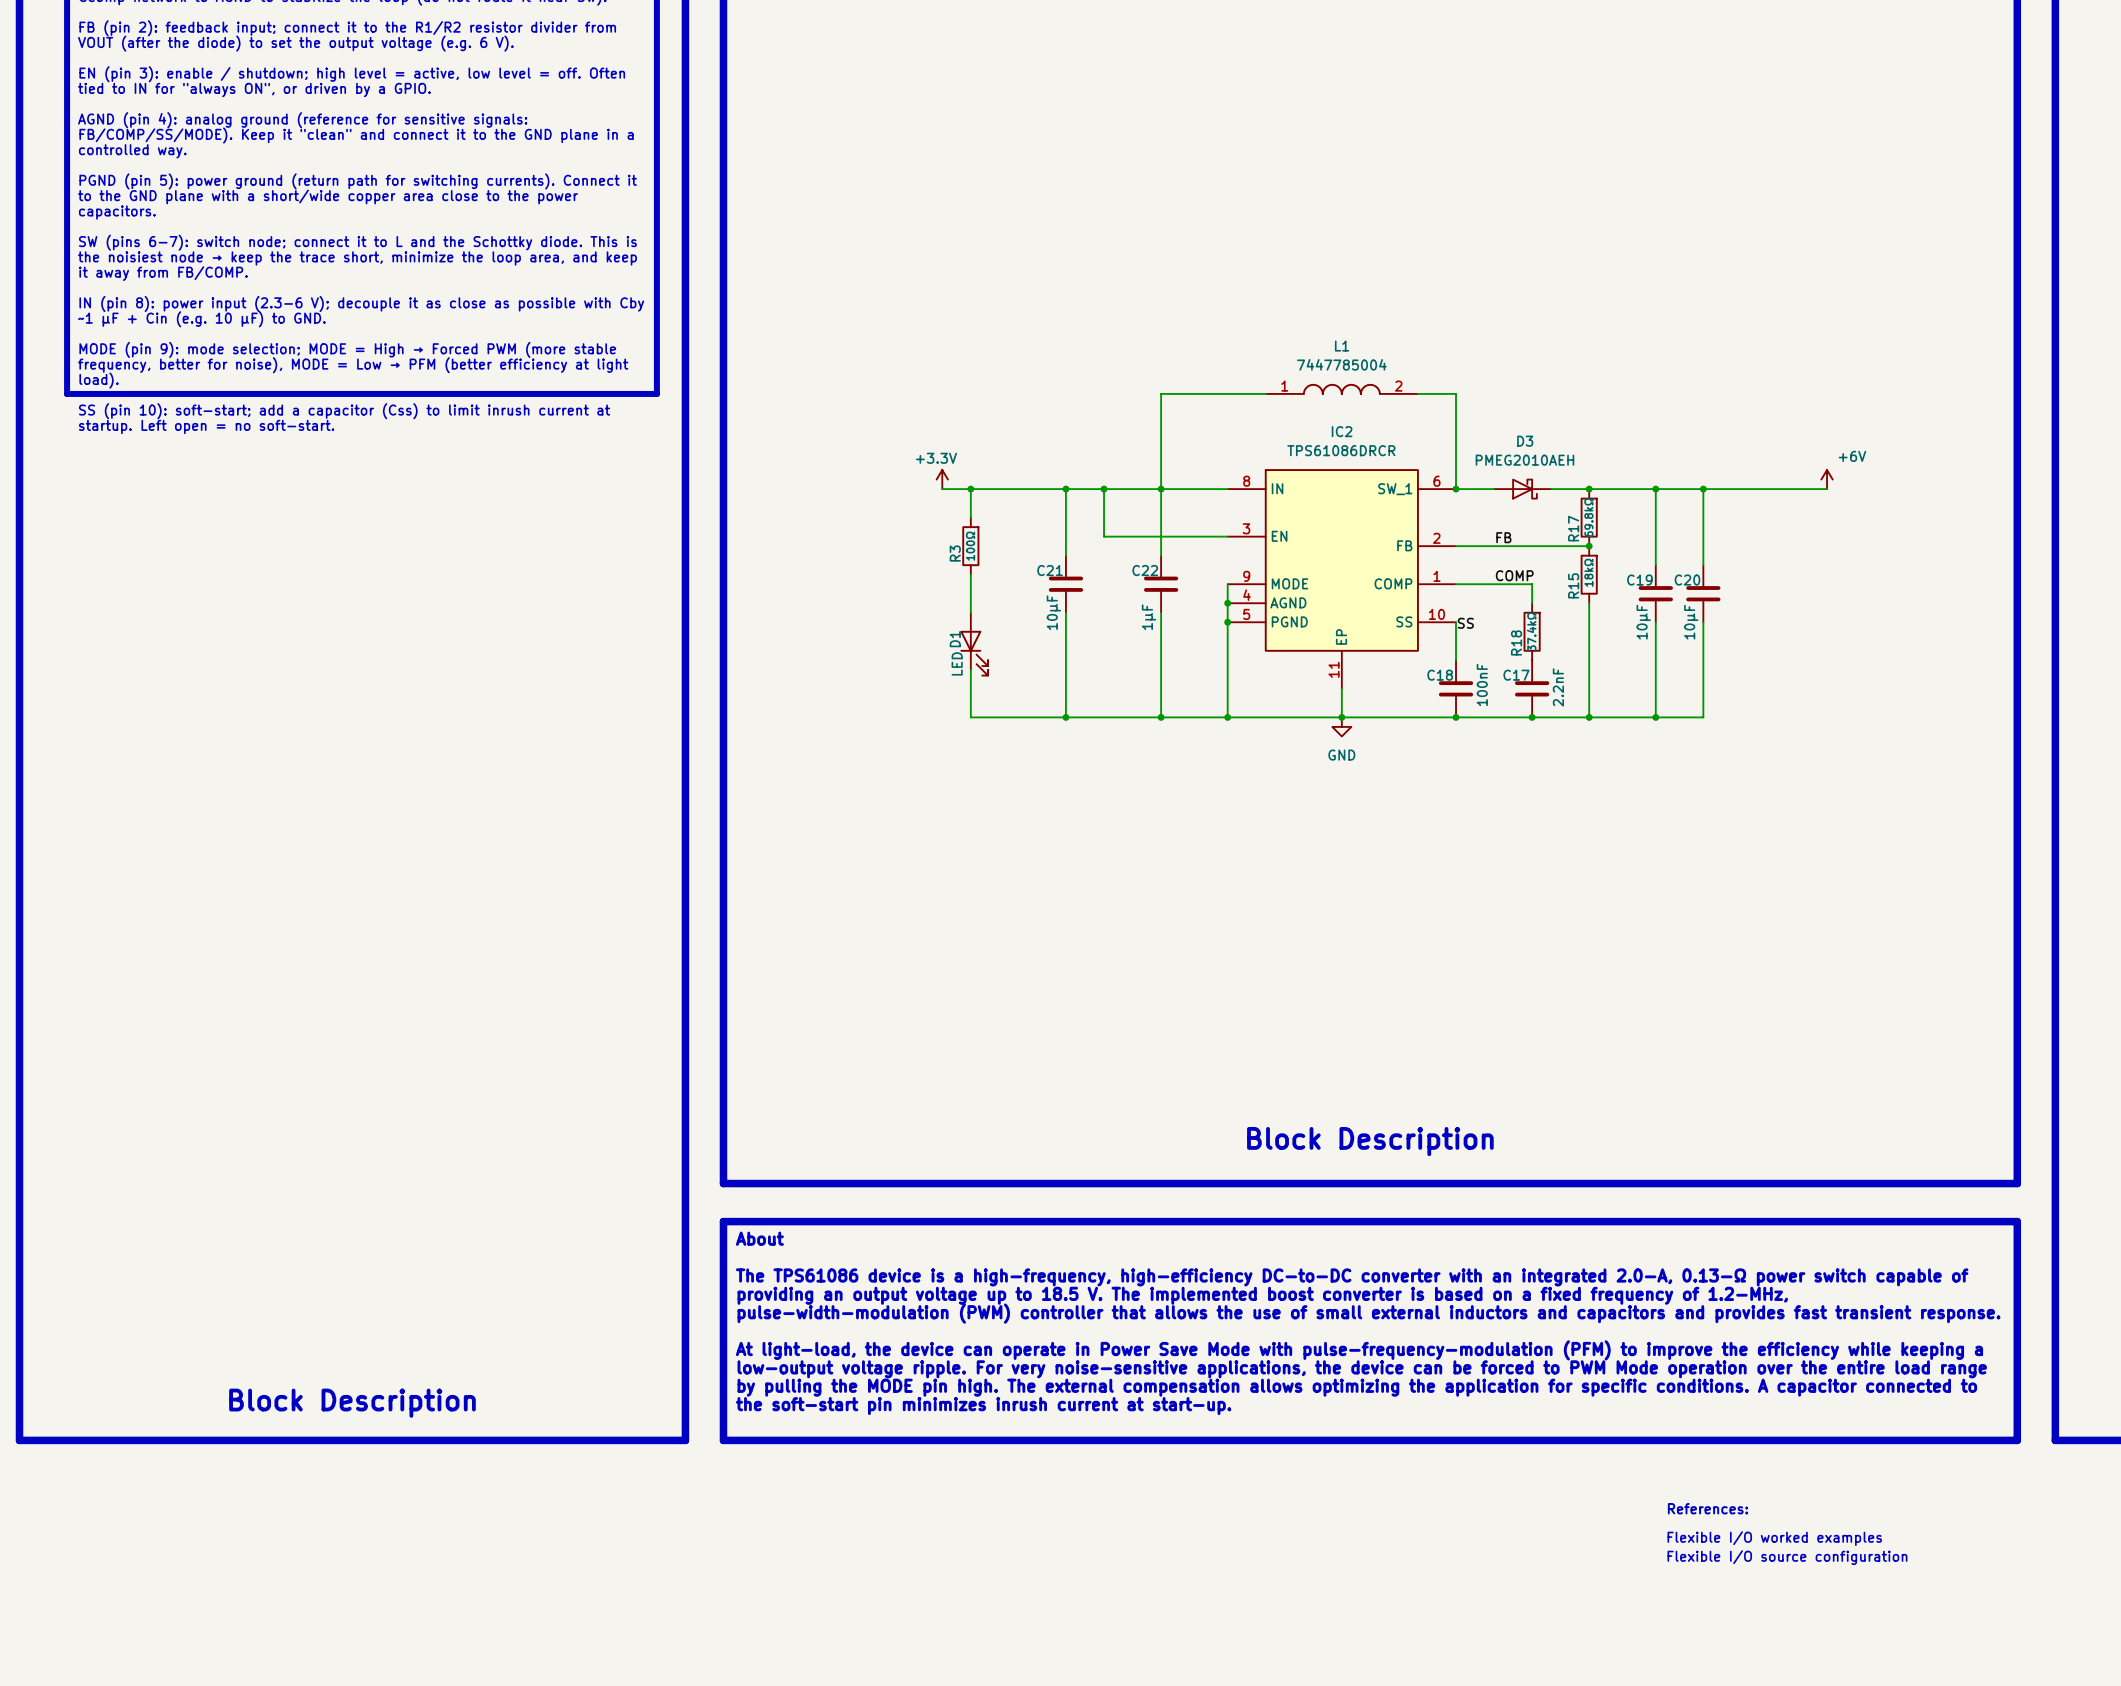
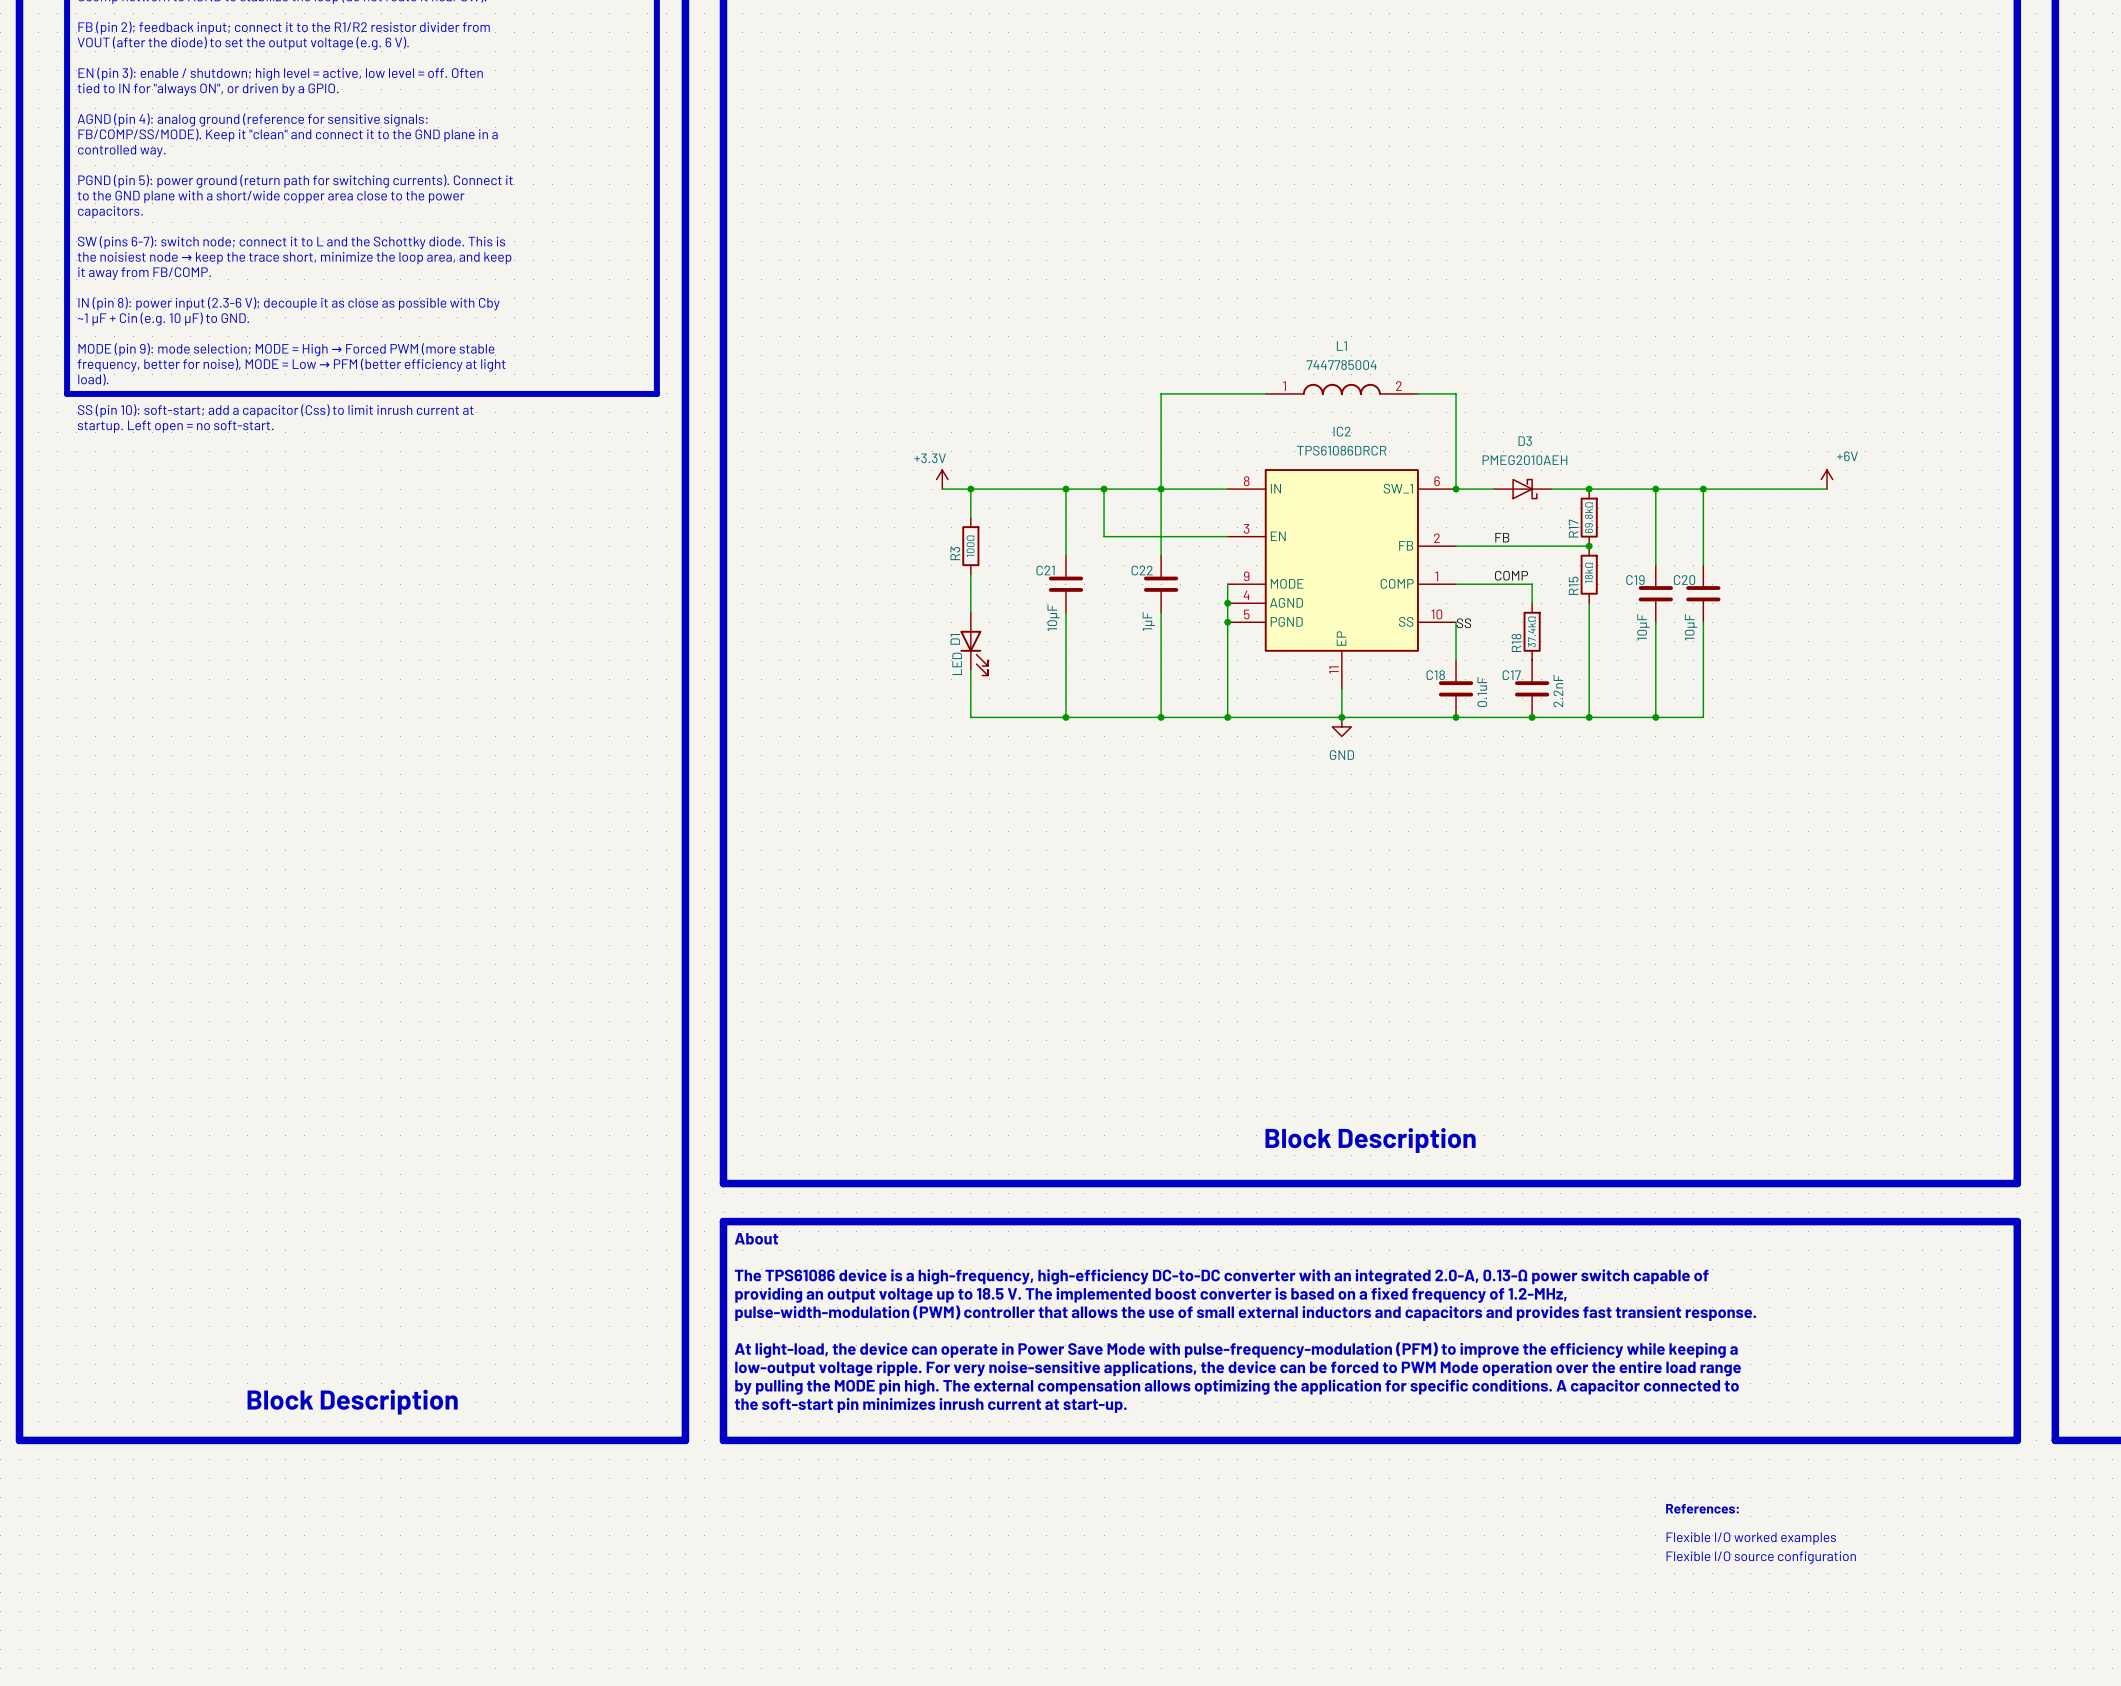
C18 value: 100nF (1482, 684) -> 0.1uF (1482, 691)

